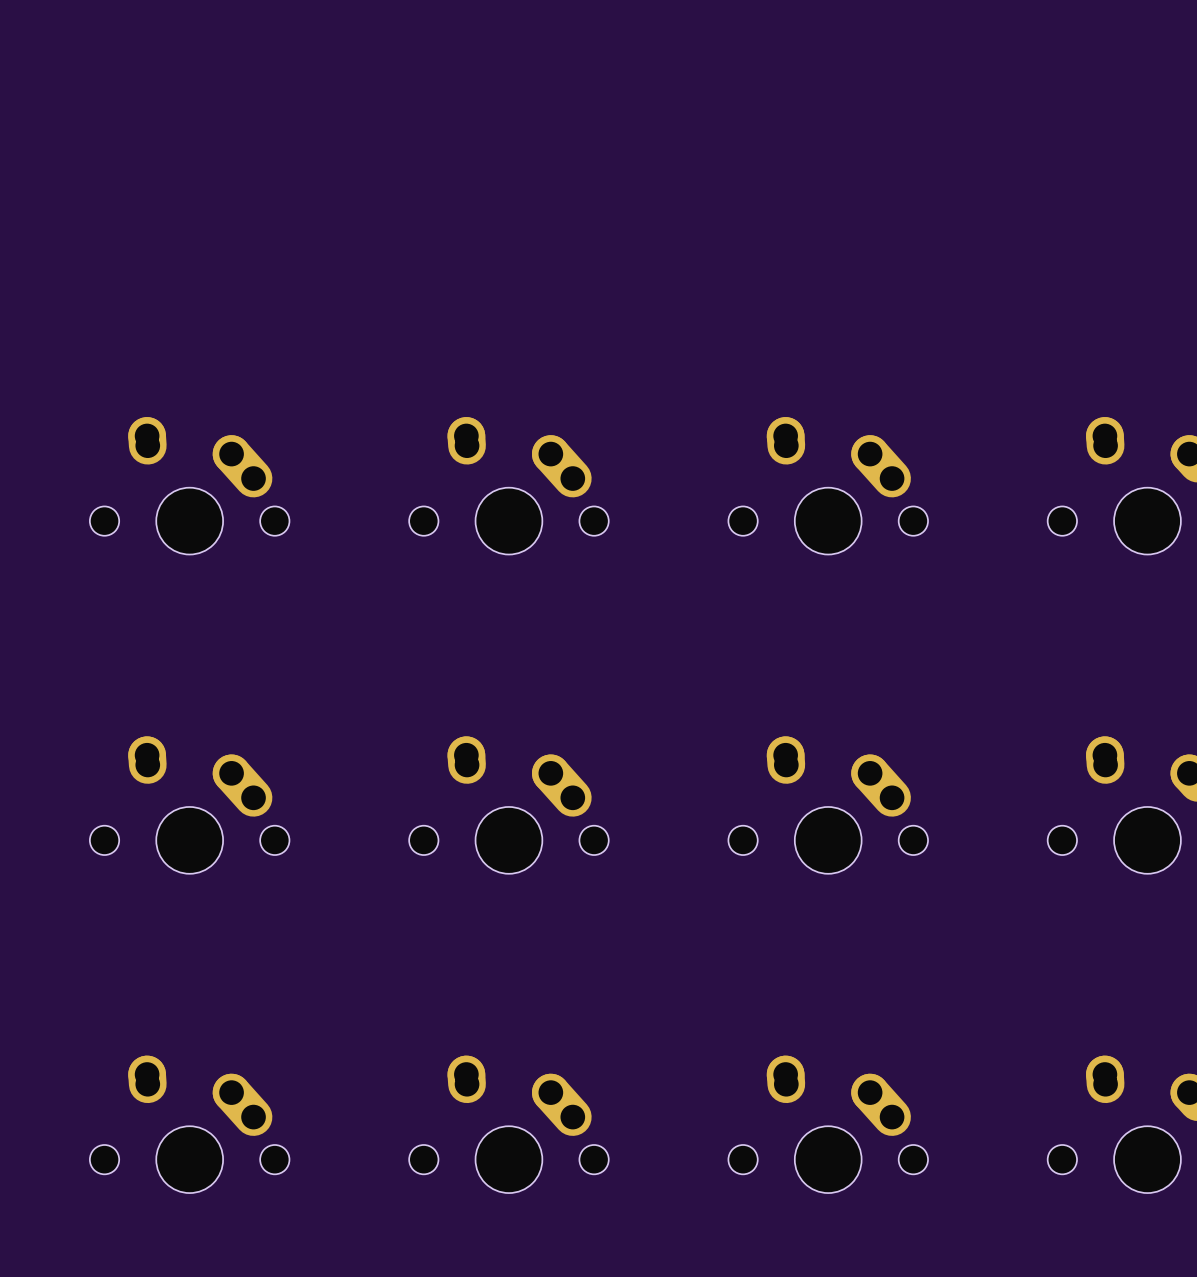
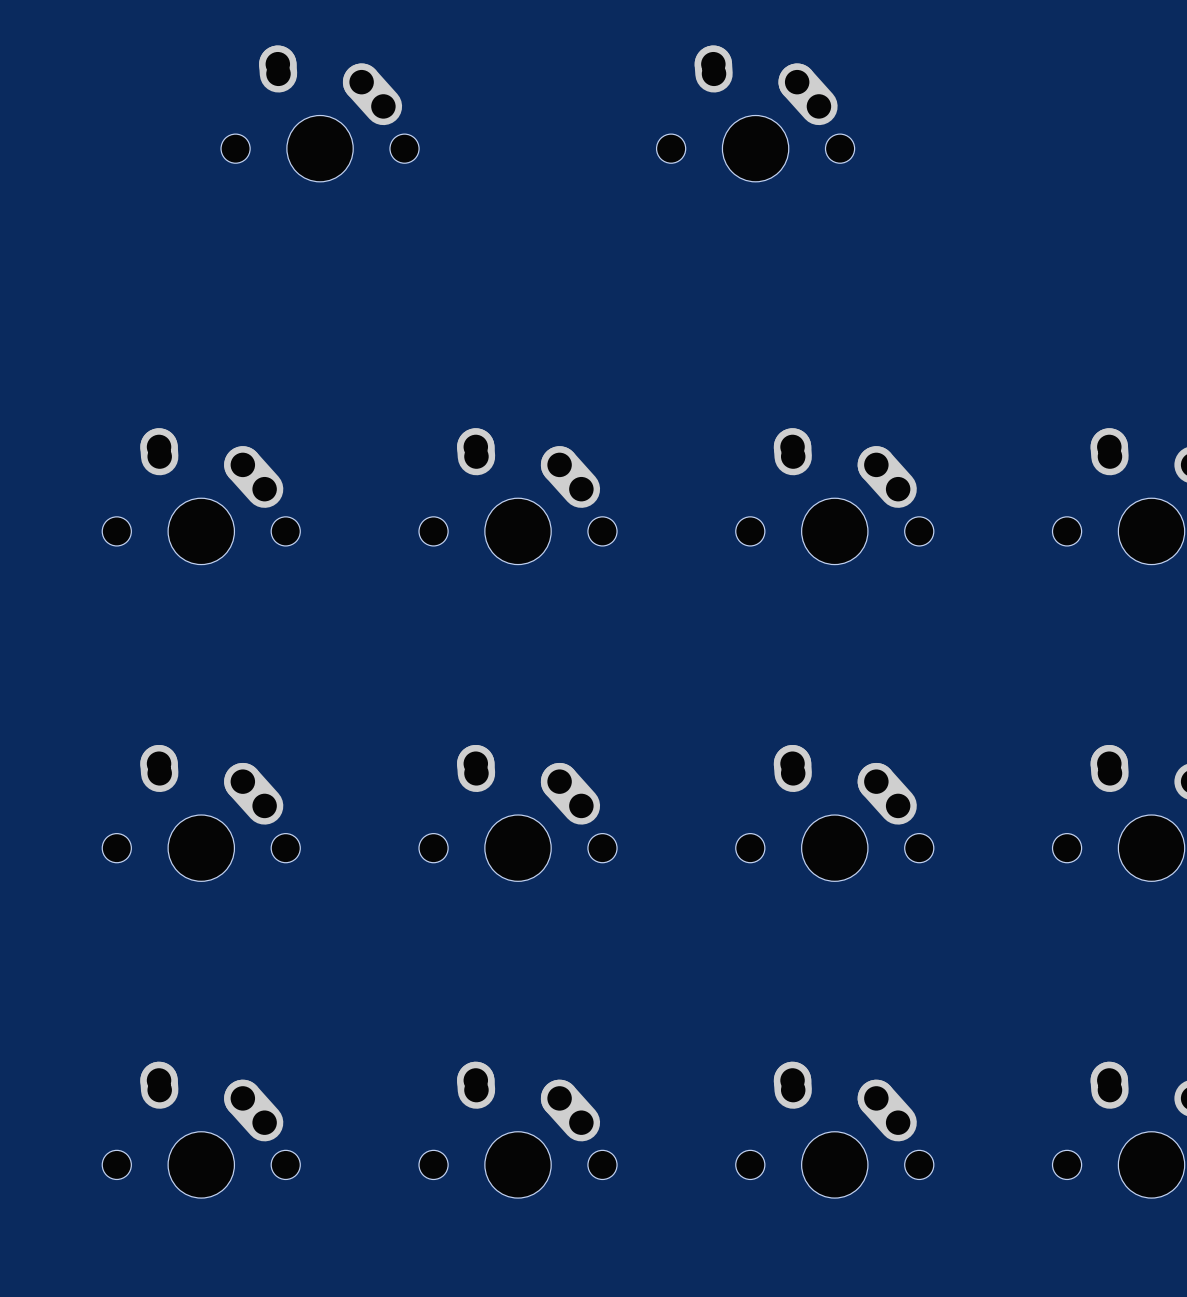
part: none -> (320, 113)
part: none -> (755, 113)

